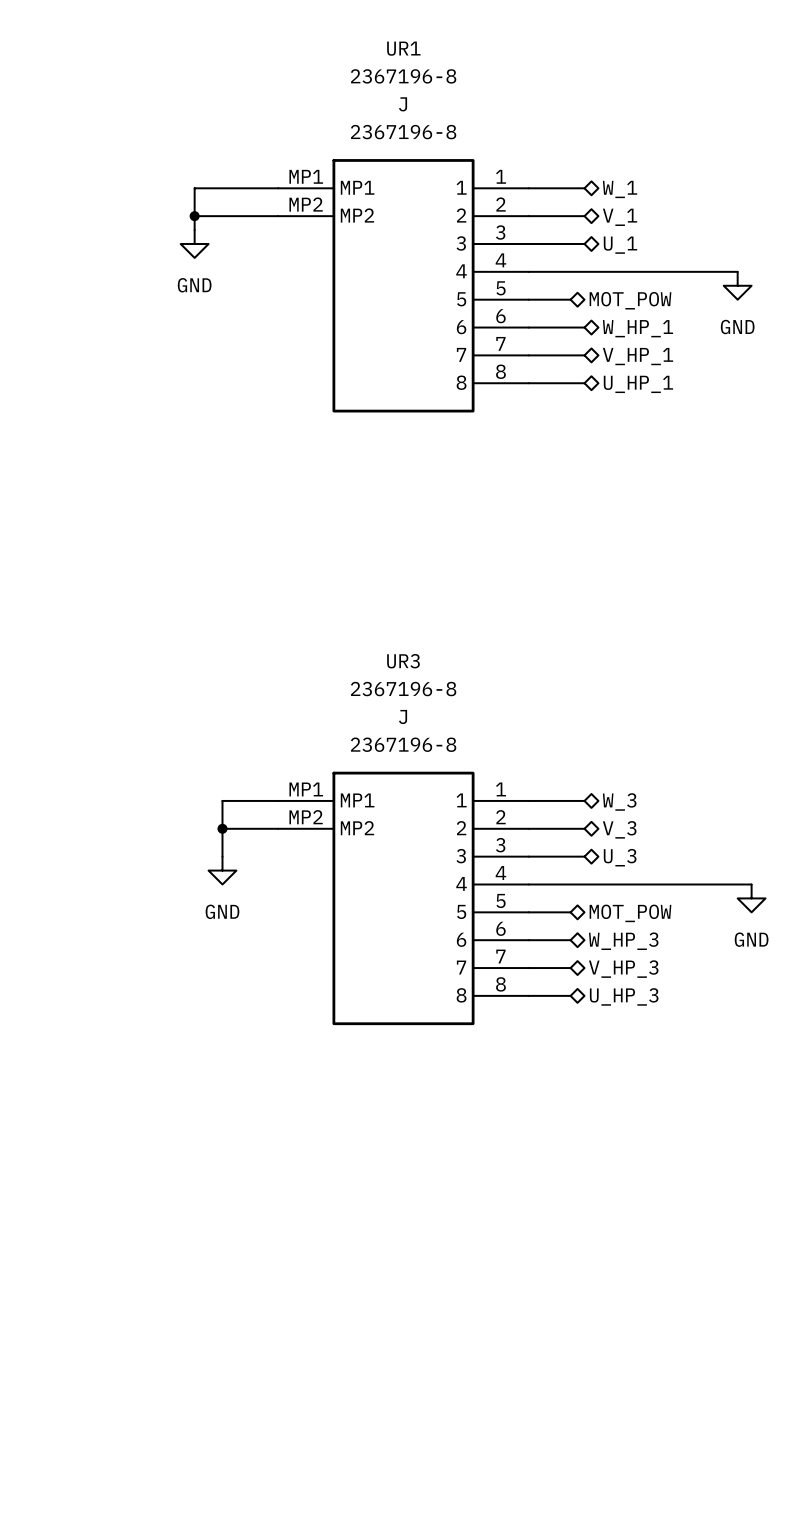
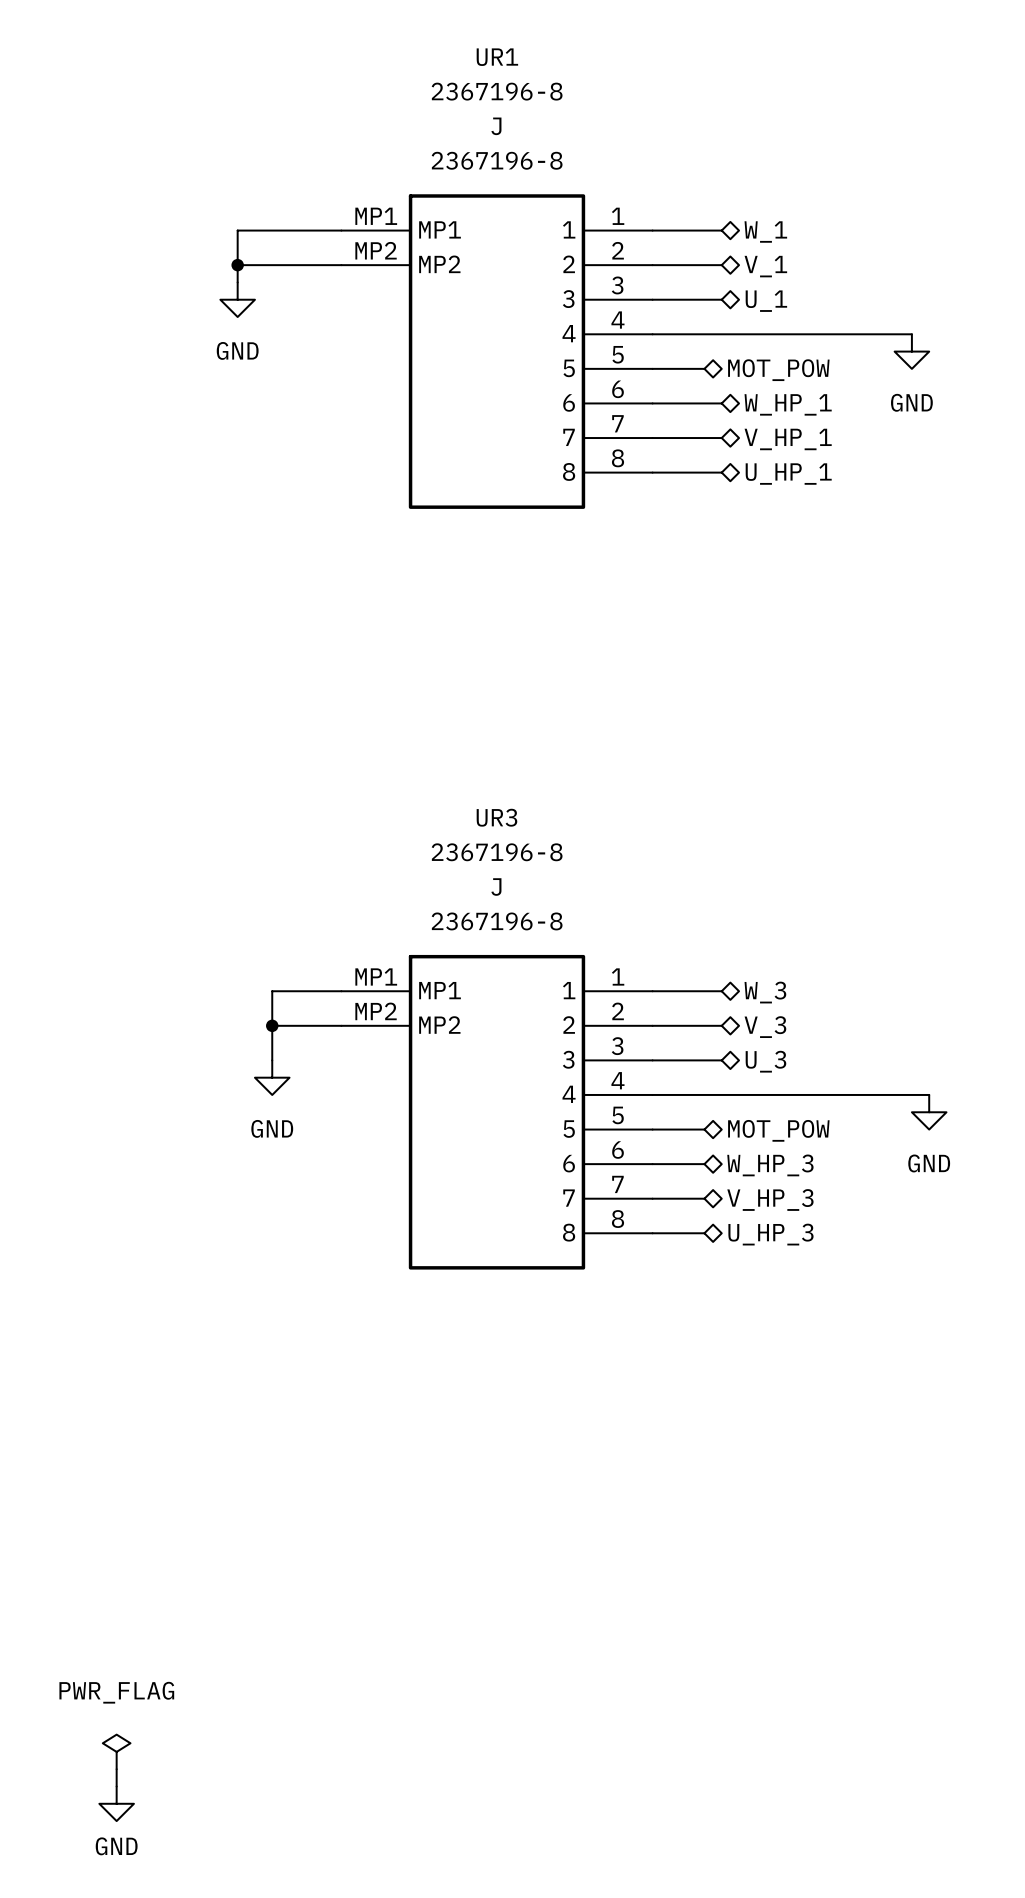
power symbol: none -> PWR_FLAG (116, 1751)
wire: none -> (116, 1769) (116, 1786)
power symbol: none -> GND (116, 1803)

